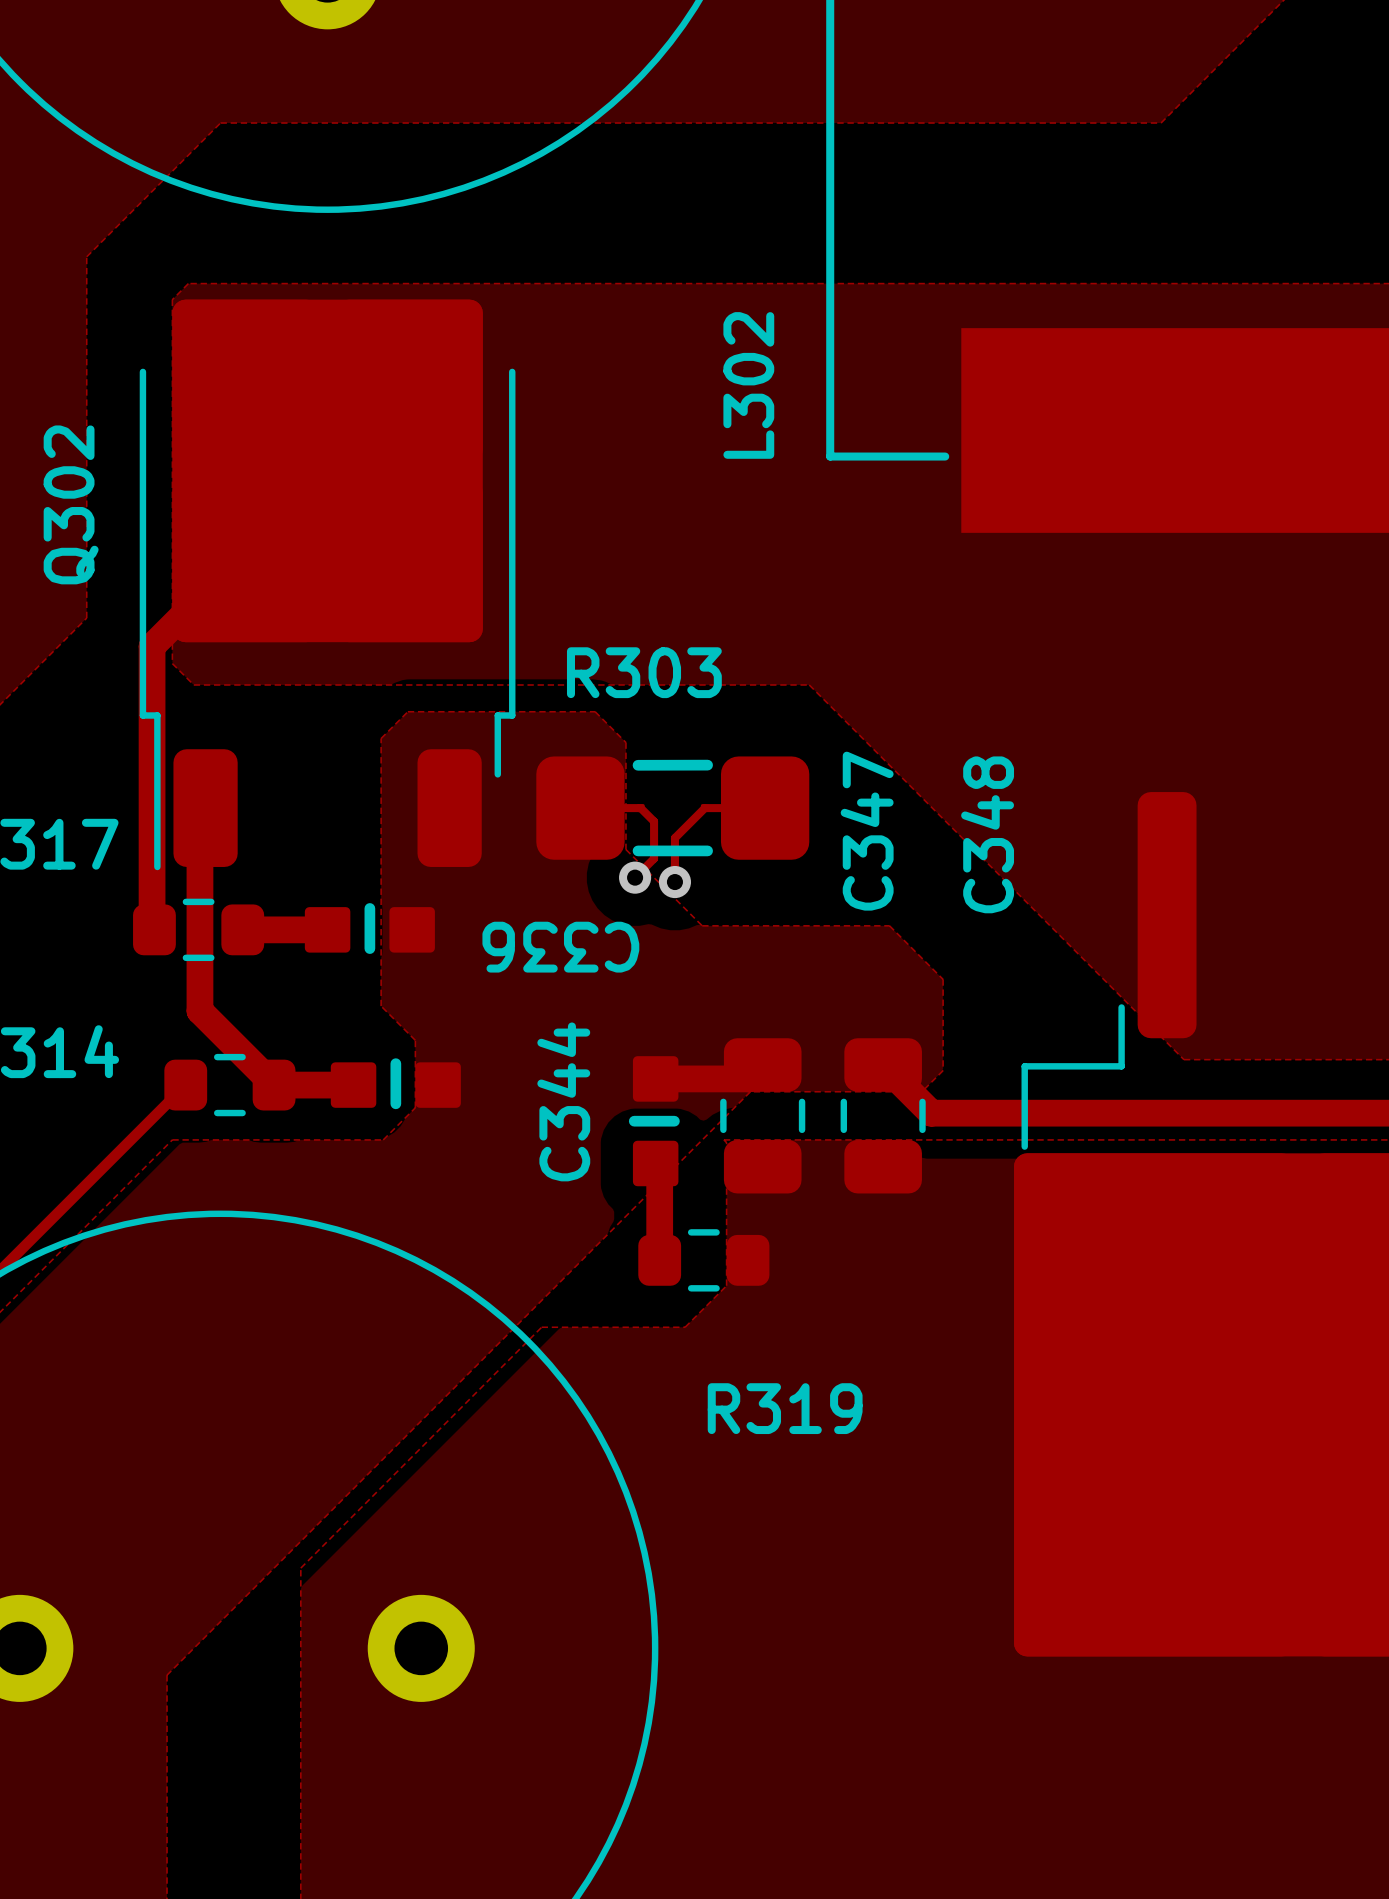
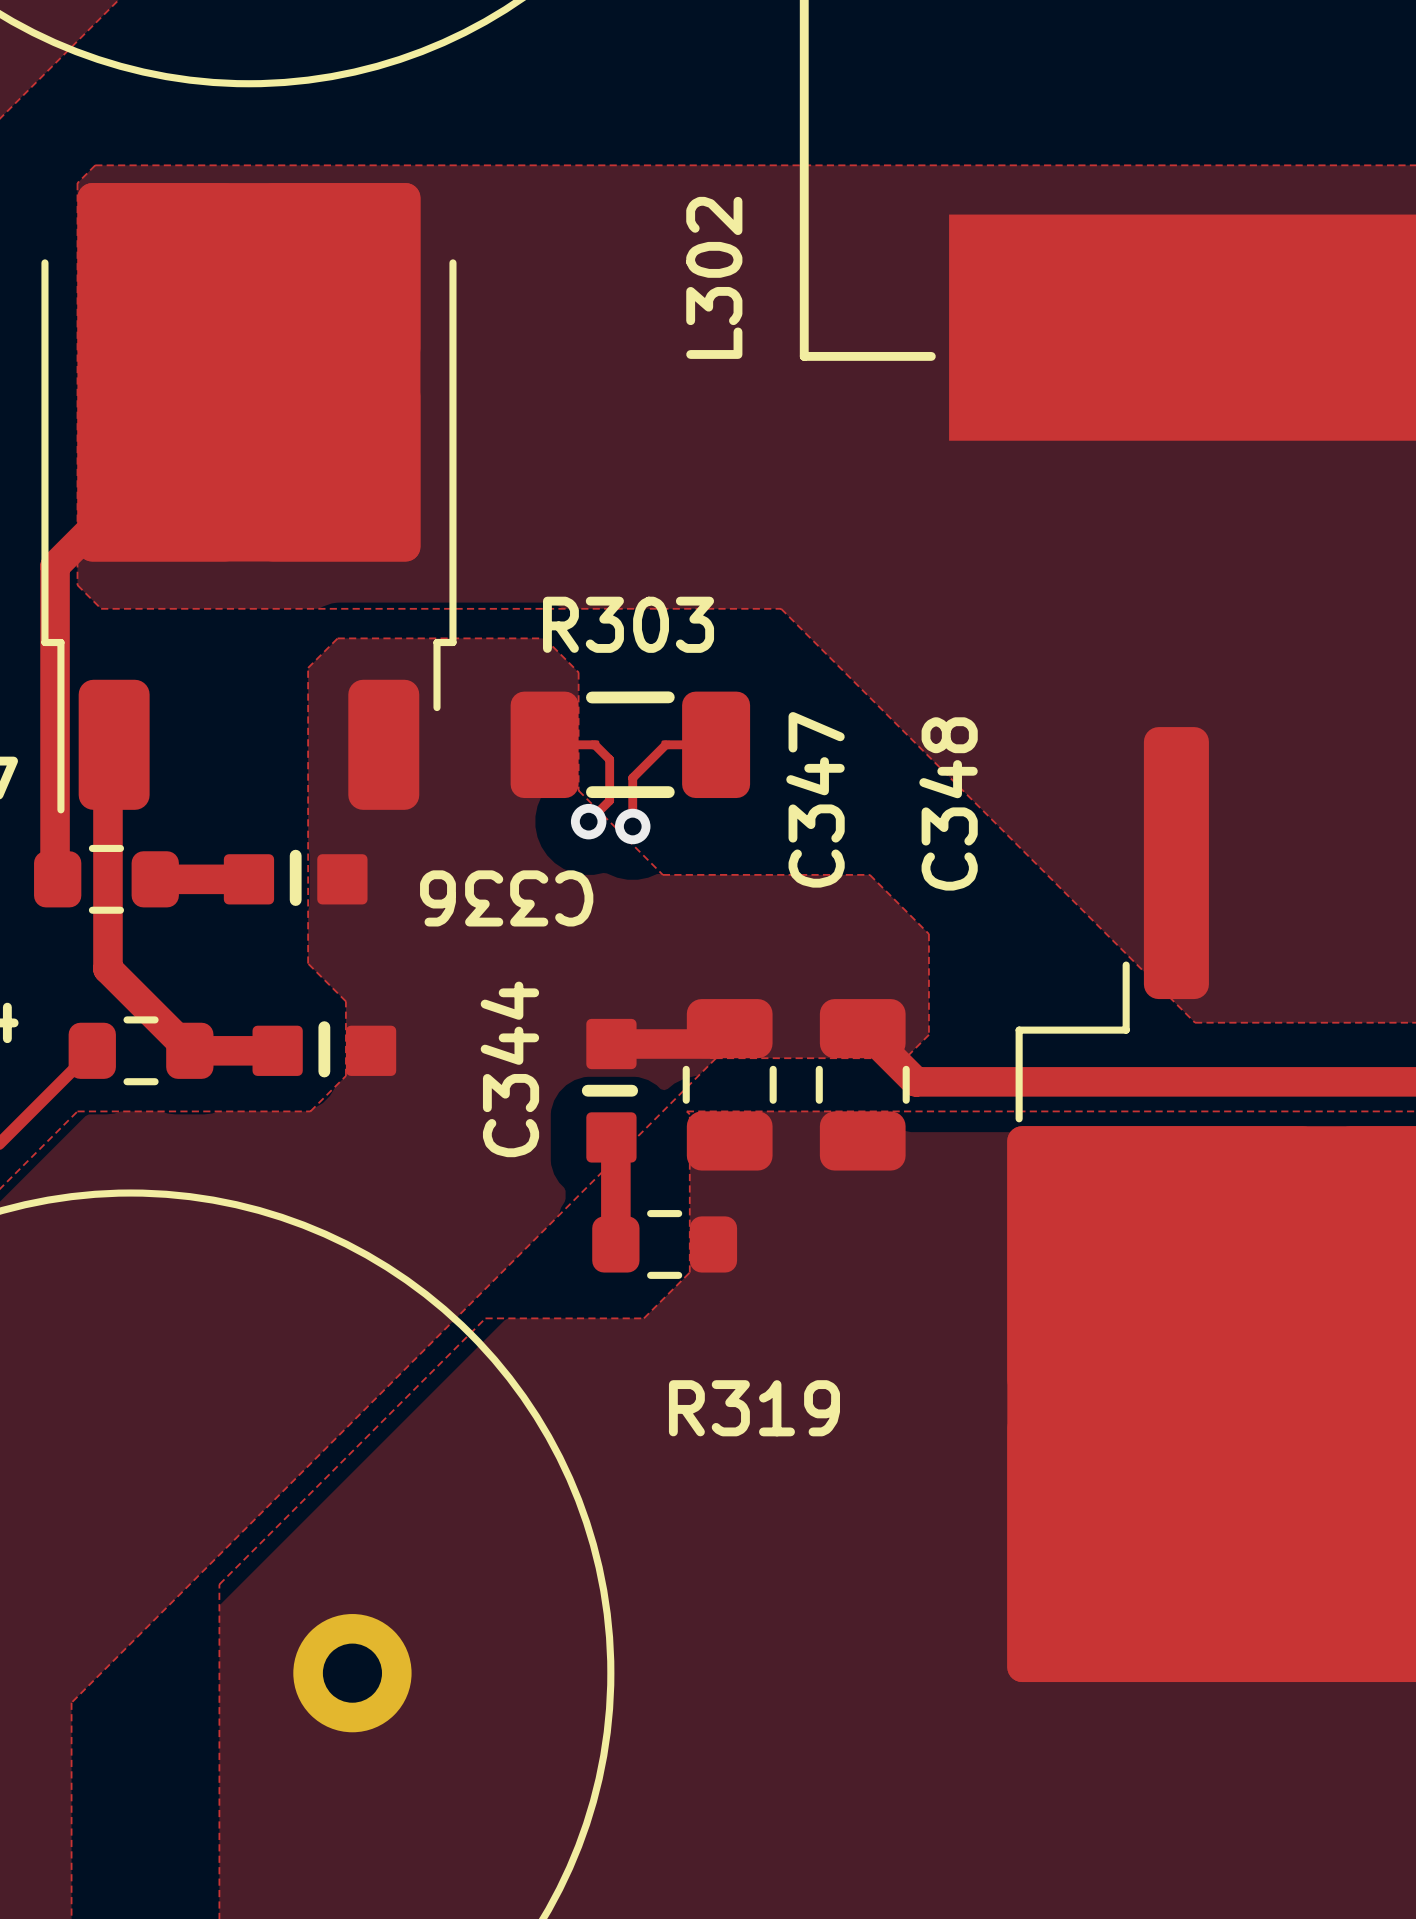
R303 name position: R303 (644, 672) -> R303 (628, 624)
R303 footprint: [536, 756, 810, 860] -> [510, 691, 751, 799]
C347 name position: C347 (867, 831) -> C347 (815, 799)
C348 name position: C348 (987, 834) -> C348 (948, 803)

